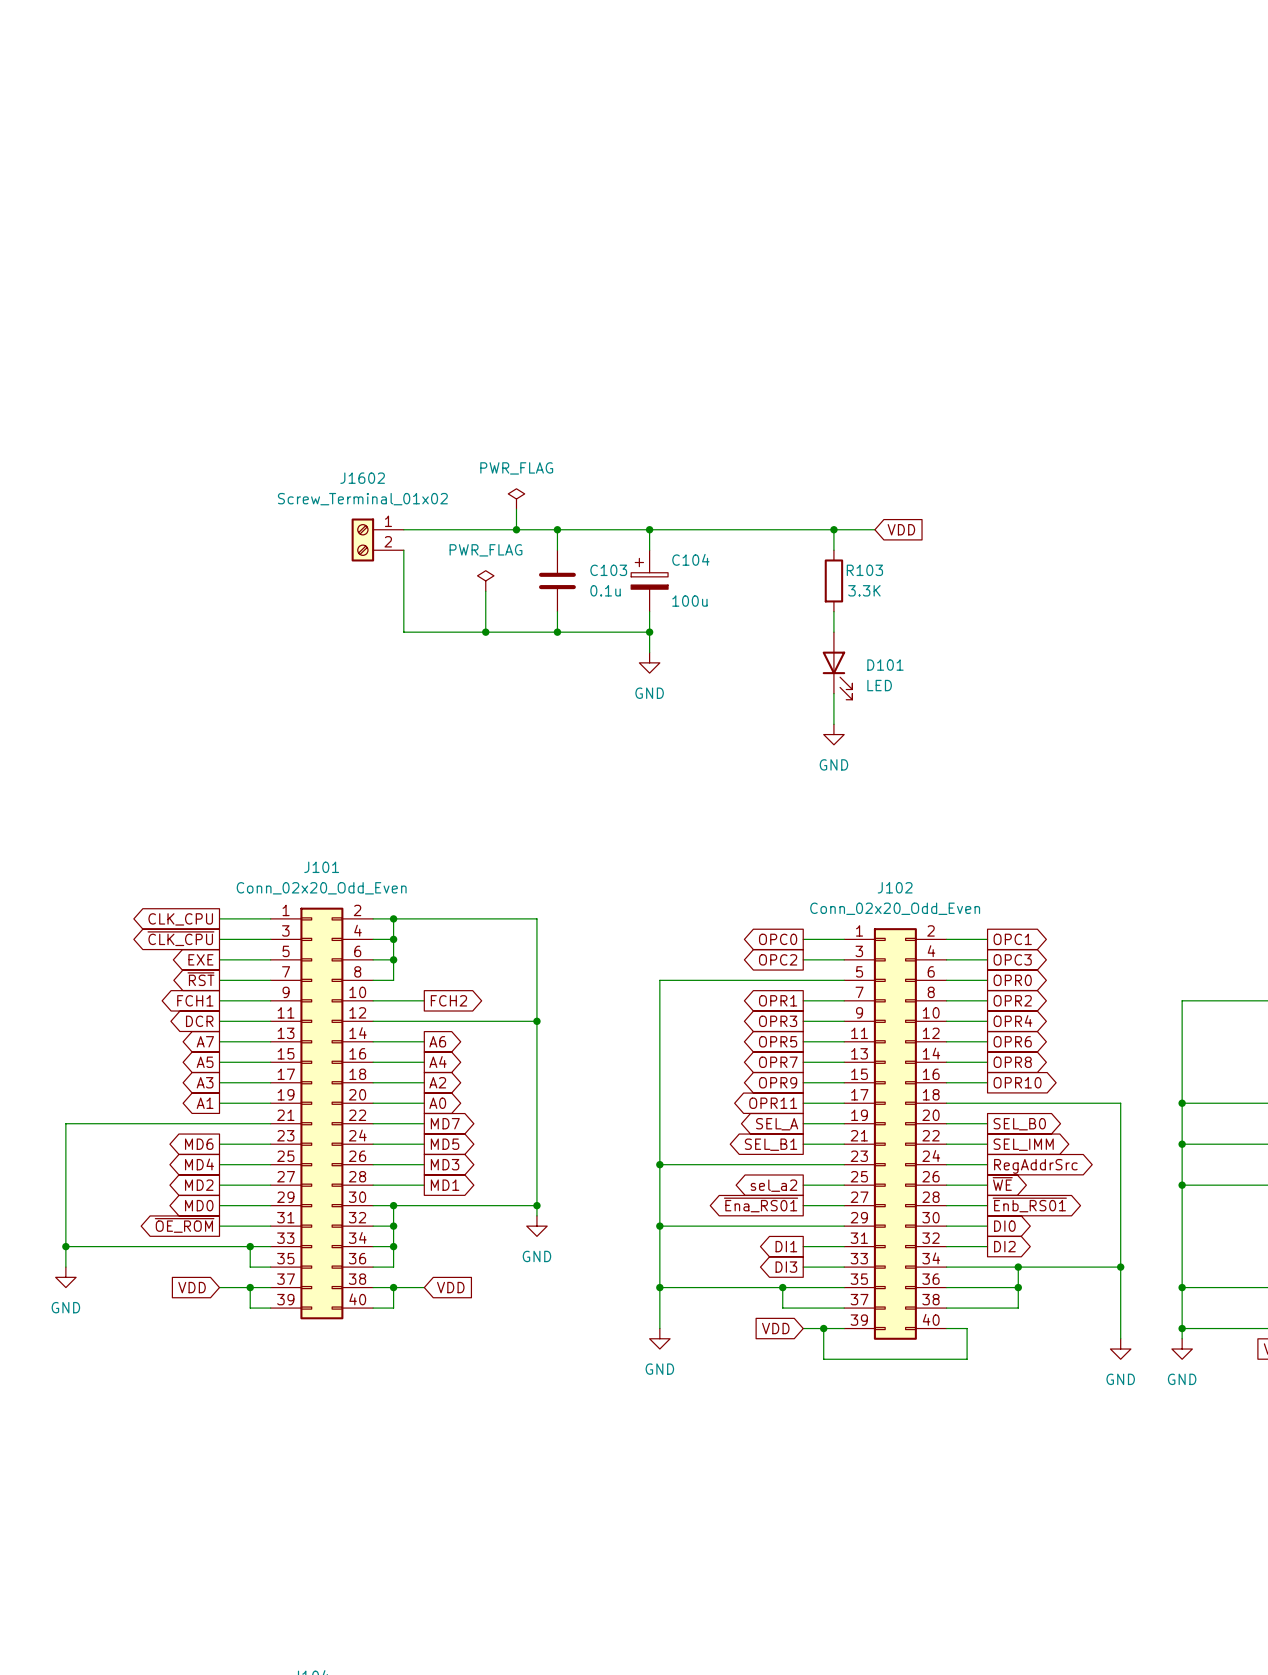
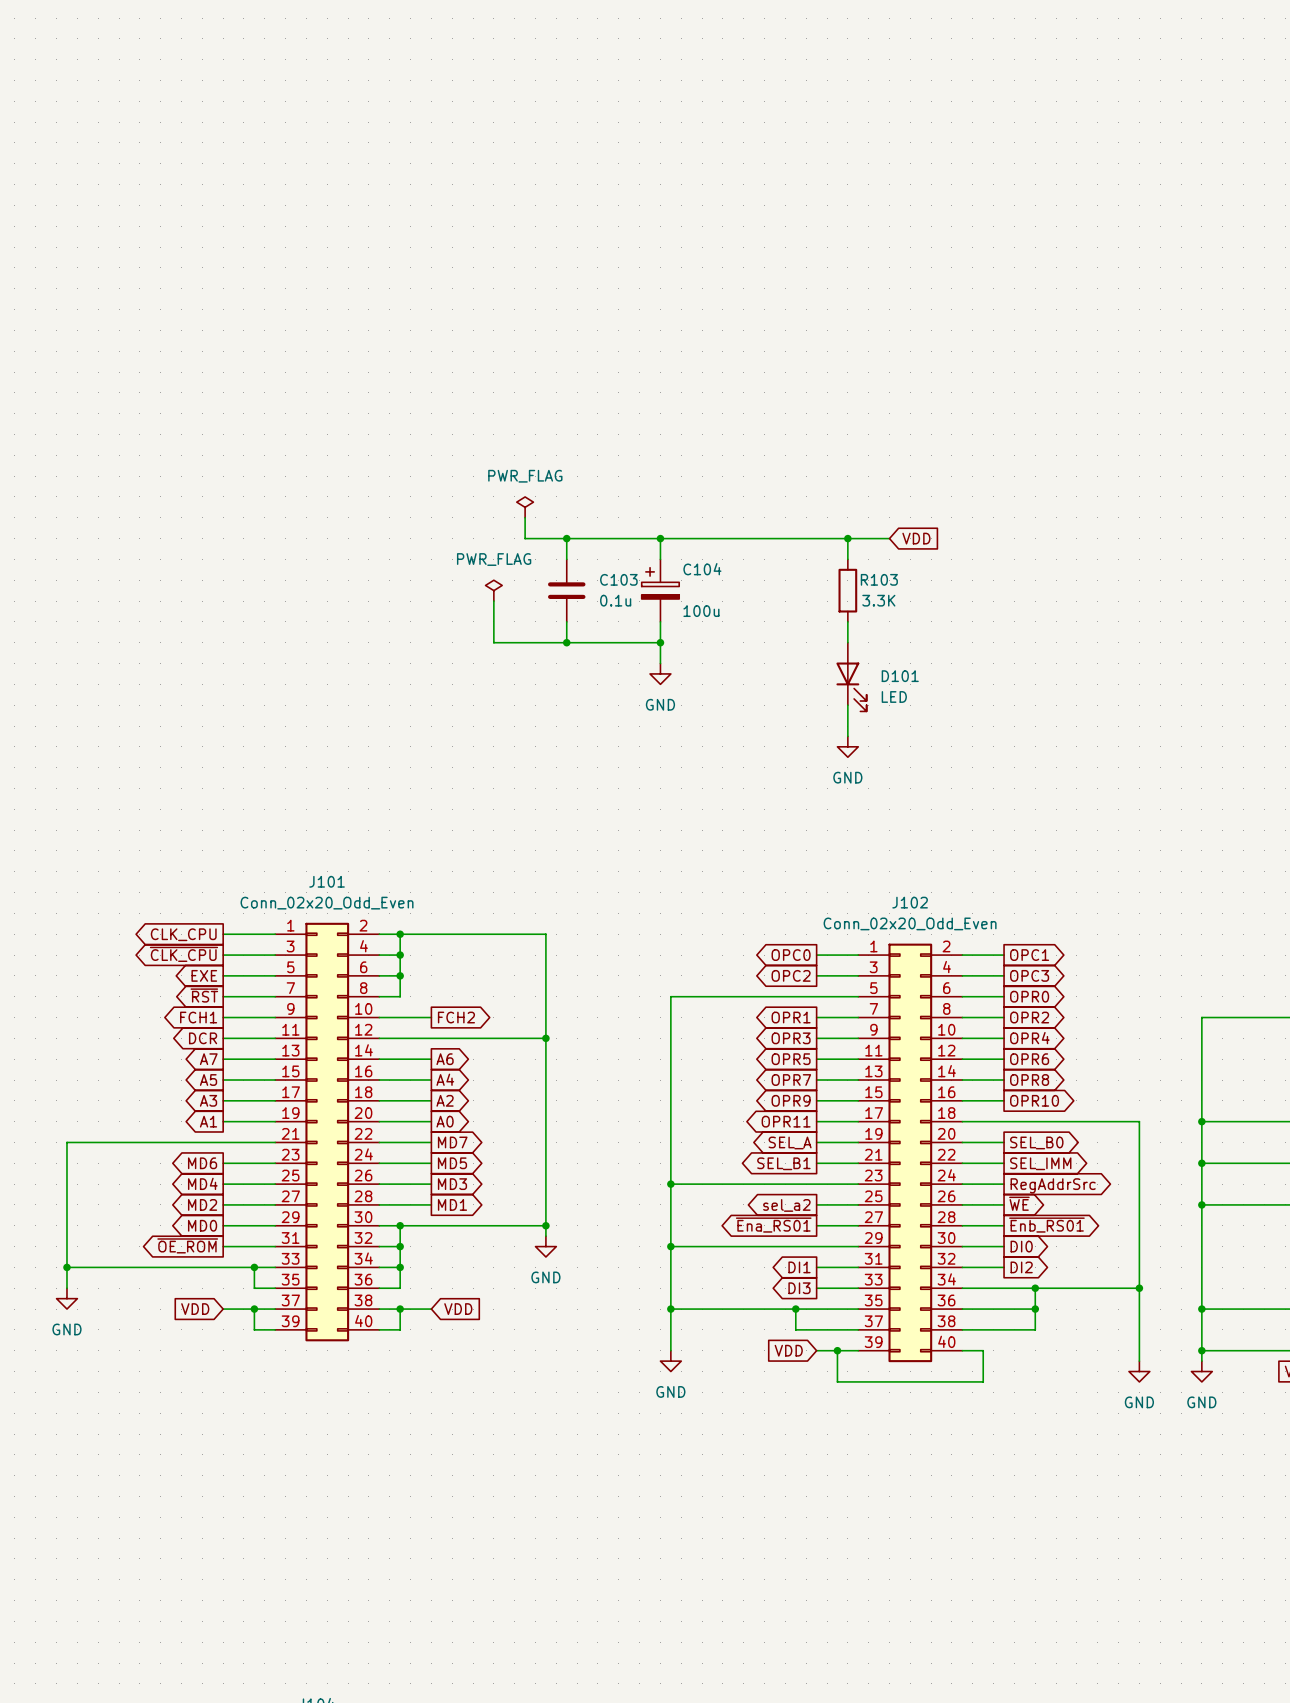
wire: (403, 529) (516, 529) -> none
junction: (516, 529) -> none
J1602: Screw_Terminal_01x02 (377, 539) -> none
wire: (403, 550) (403, 632) (485, 632) -> none
junction: (485, 632) -> none

